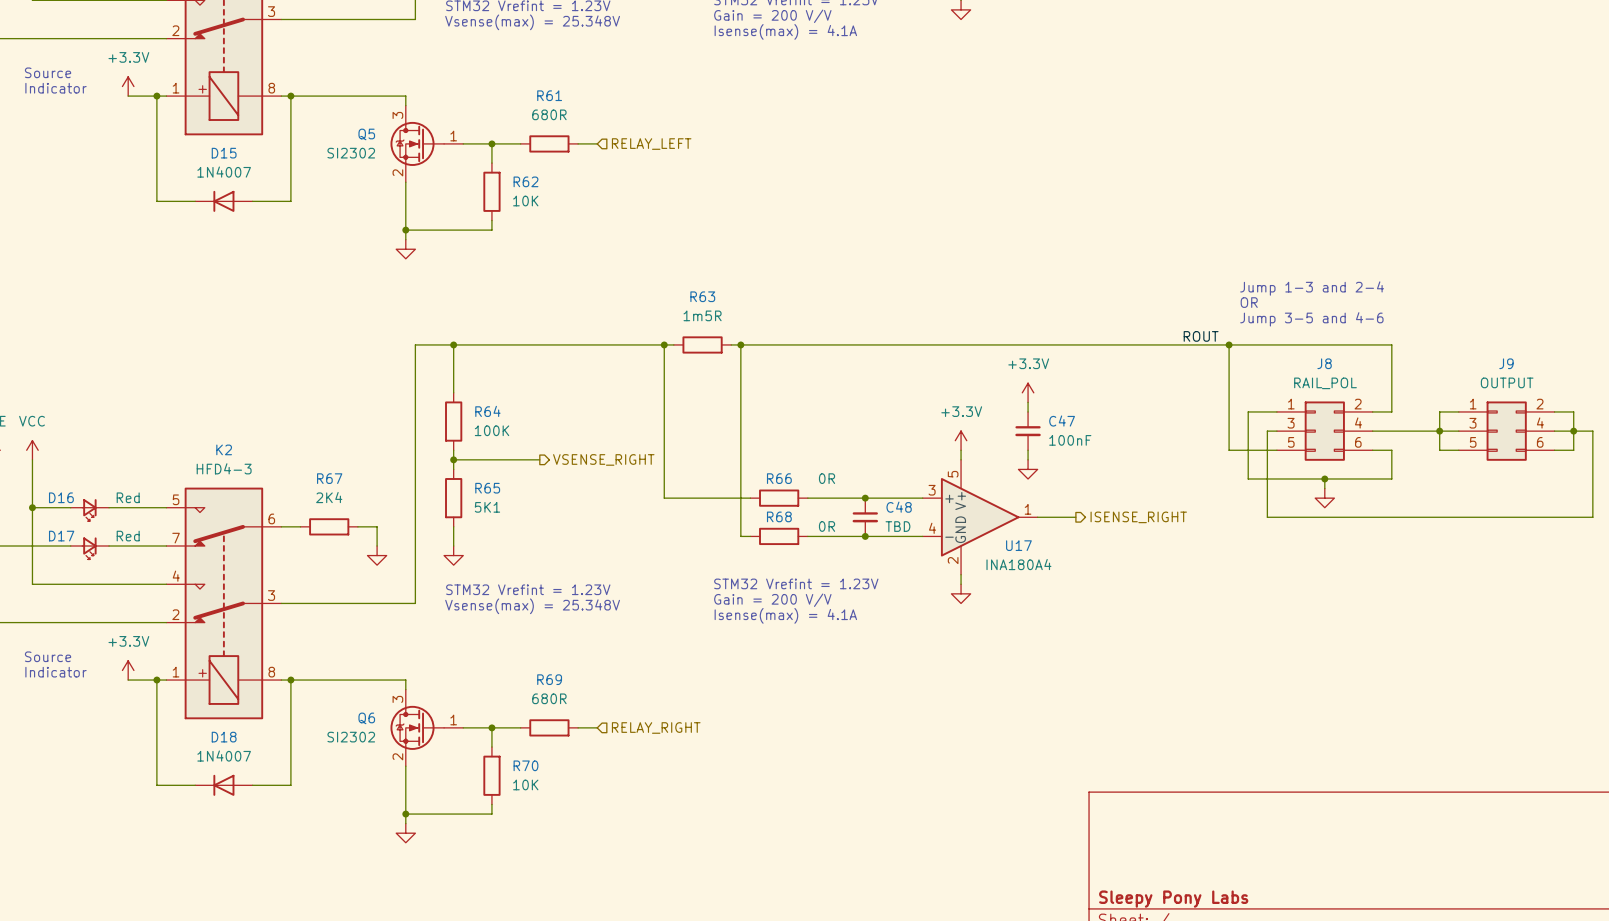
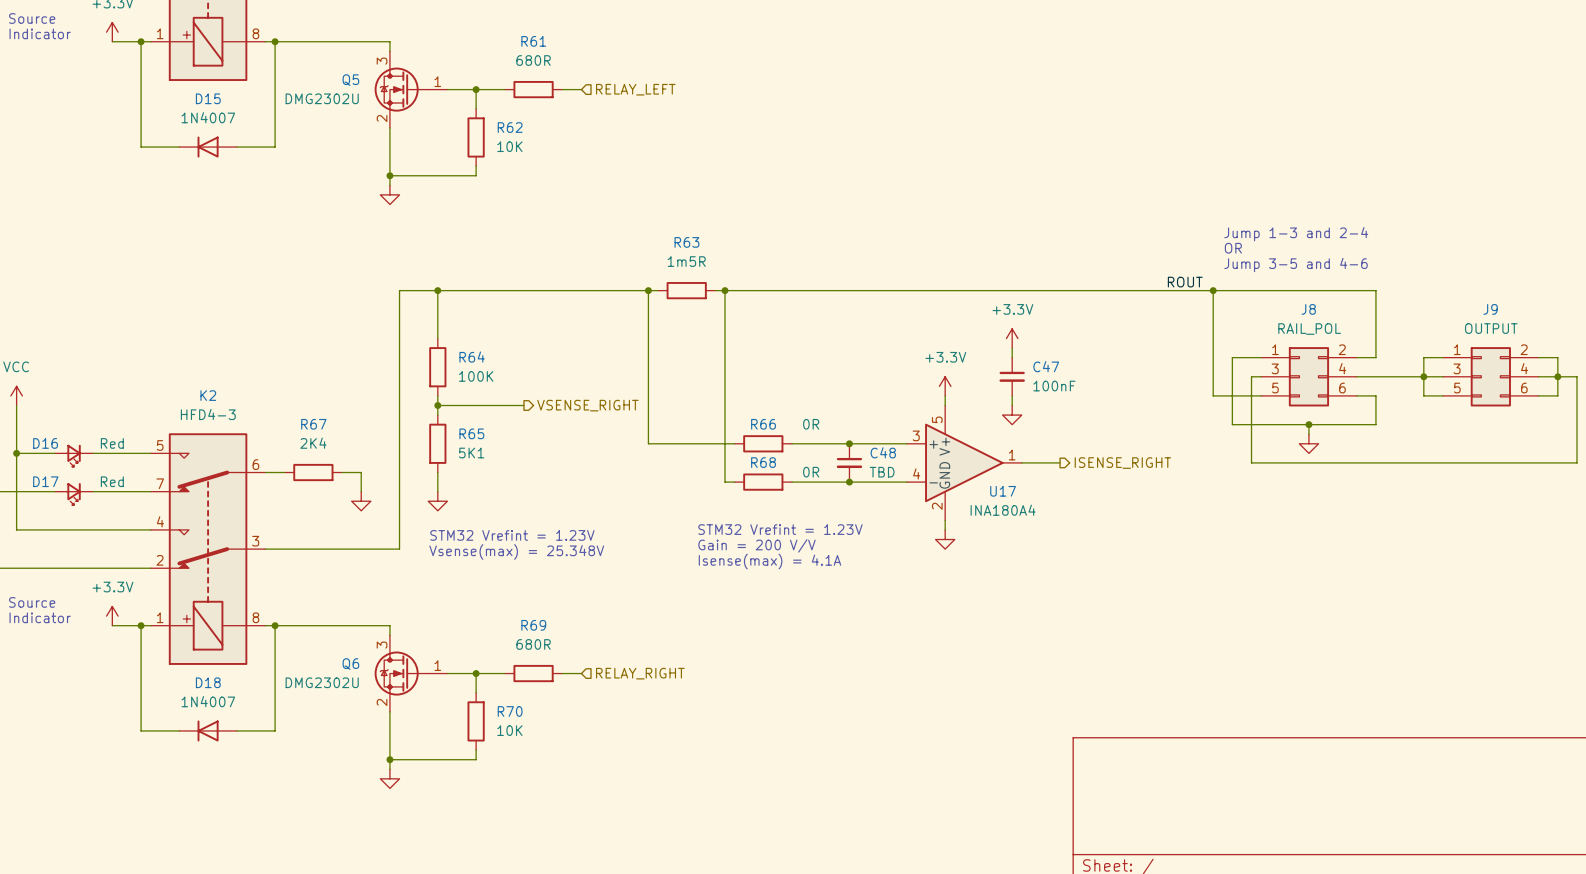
Q5 value: SI2302 (351, 153) -> DMG2302U (322, 98)
Q6 value: SI2302 (351, 737) -> DMG2302U (322, 682)
title block: Sleepy Pony Labs (1173, 899) -> none

